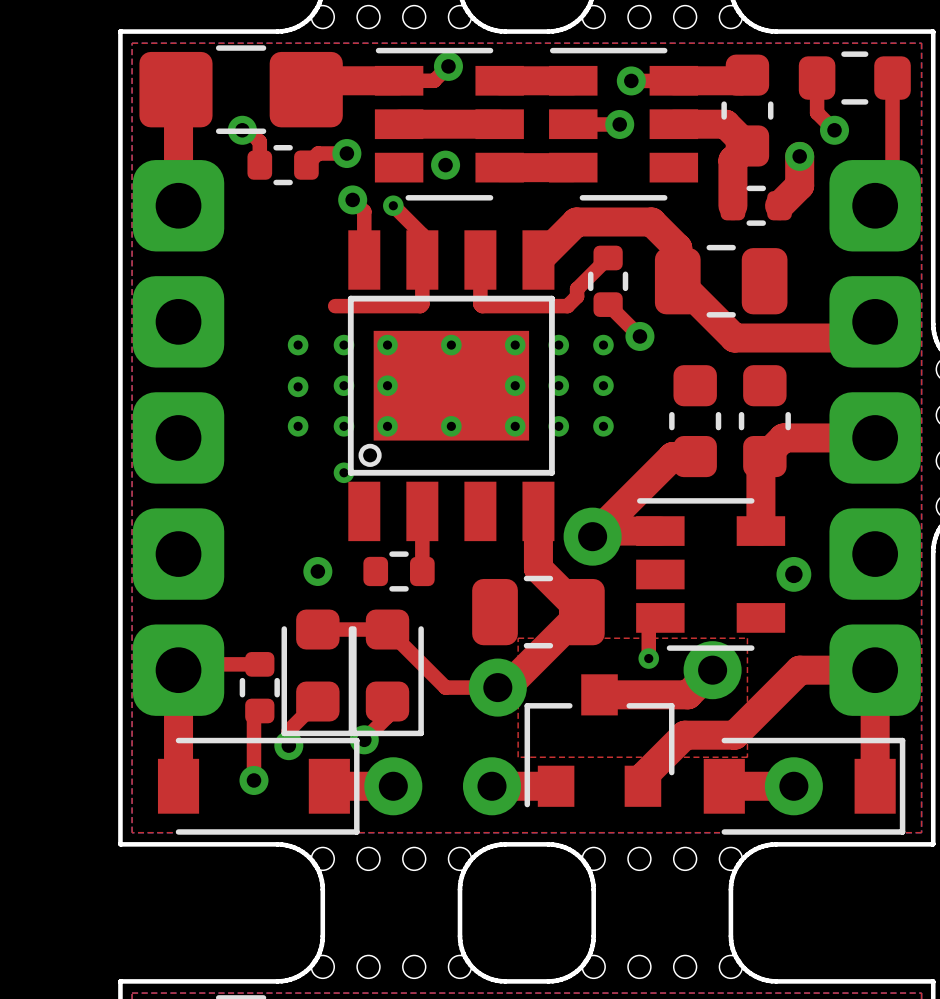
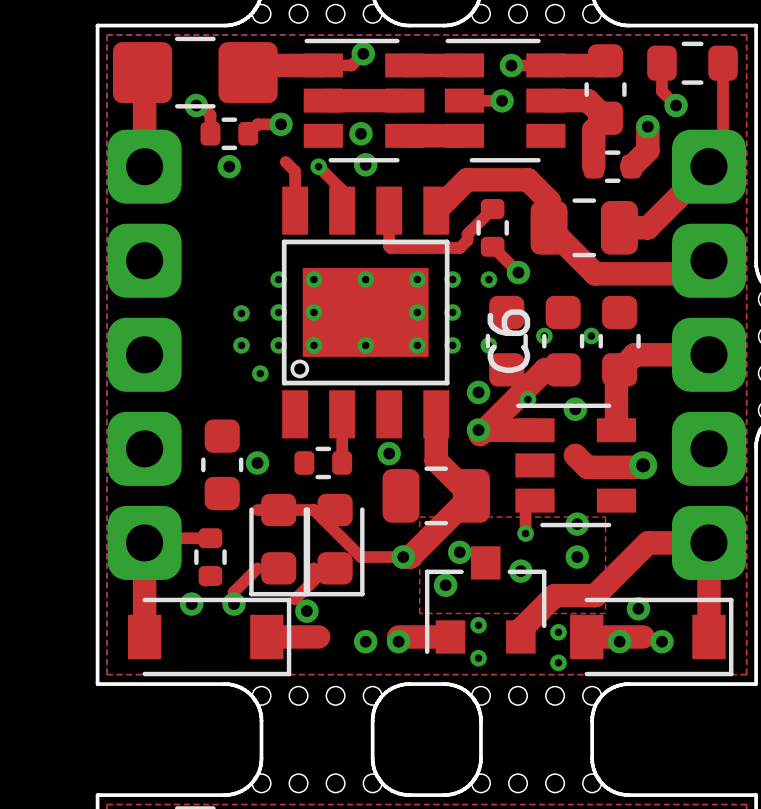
via: (352, 199) -> none
via: none -> (365, 164)
via: none -> (229, 166)
top track: none -> (709, 166) (647, 227) (619, 227)
top track: (422, 260) (422, 304) (420, 306) (335, 306) -> none
via: (298, 345) -> none
via: (603, 385) -> none
via: none -> (544, 336)
via: none -> (591, 336)
part: none -> (506, 341)
C6 name: none -> C6 (508, 341)
via position: (343, 472) -> (260, 373)
via: none -> (478, 392)
via: none -> (527, 399)
via: none -> (575, 409)
via size: [563, 507, 622, 566] -> [466, 418, 491, 442]
via: none -> (389, 453)
top track: none -> (575, 455) (587, 467) (642, 467)
part: none -> (222, 464)
via: none -> (577, 524)
via size: [468, 658, 527, 717] -> [391, 545, 416, 569]
top track: (712, 670) (687, 694) (599, 694) -> none
via: (712, 670) -> none
part: (317, 672) -> none
part: none -> (278, 545)
part: (387, 672) -> none
part: none -> (335, 545)
via: none -> (459, 552)
via: none -> (577, 557)
via: none -> (520, 571)
top track: (253, 716) (253, 780) -> none
via: none -> (445, 585)
via position: (364, 739) -> (306, 611)
via: none -> (638, 608)
via size: [462, 757, 522, 816] -> [386, 629, 411, 654]
via: none -> (478, 625)
via position: (253, 780) -> (191, 604)
via: none -> (558, 632)
via: (393, 786) -> none
via: (793, 786) -> none
via: none -> (365, 641)
via: none -> (619, 641)
via: none -> (661, 641)
via: none -> (478, 658)
via: none -> (558, 662)

